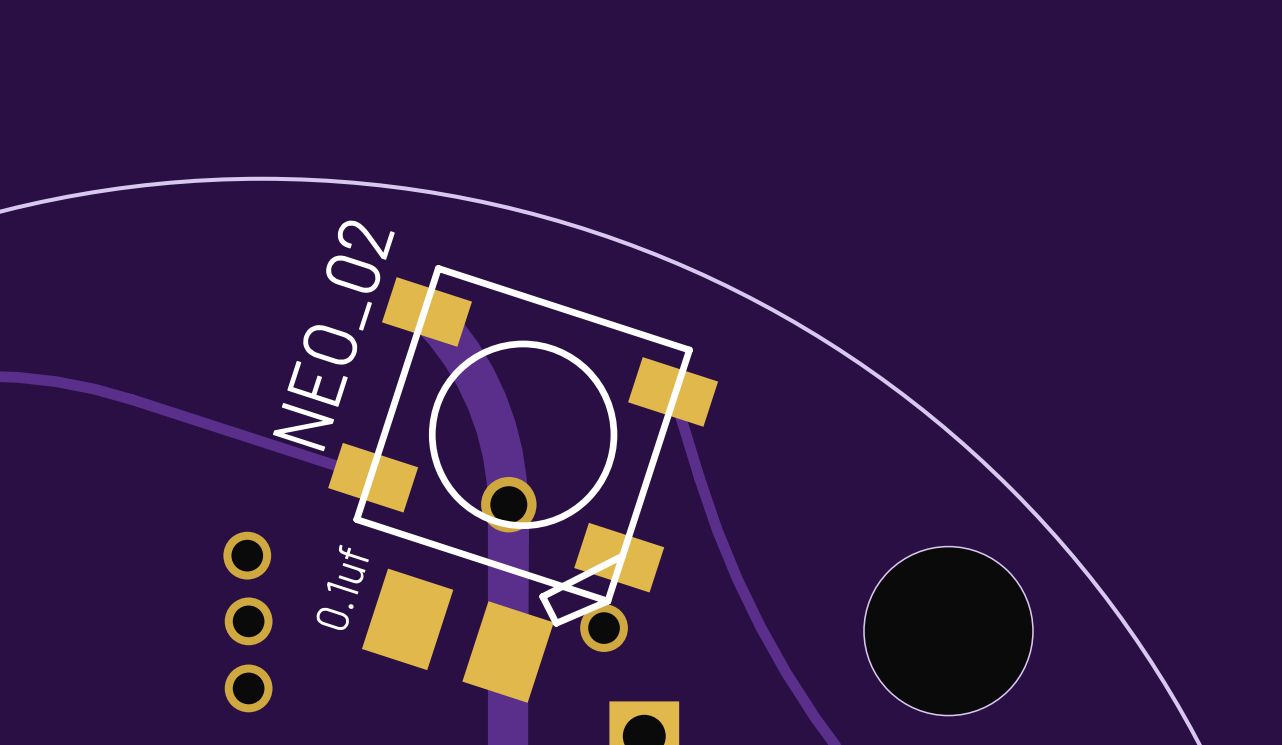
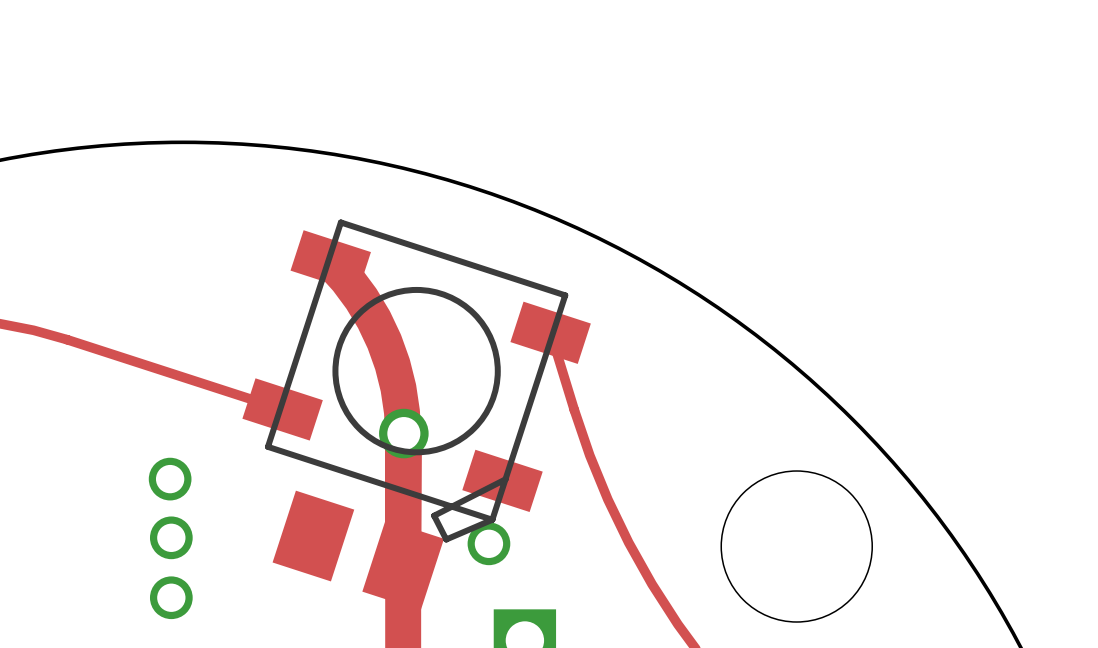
NEO_02 name: NEO_02 (333, 335) -> none
part value: 0.1uf (342, 587) -> none

